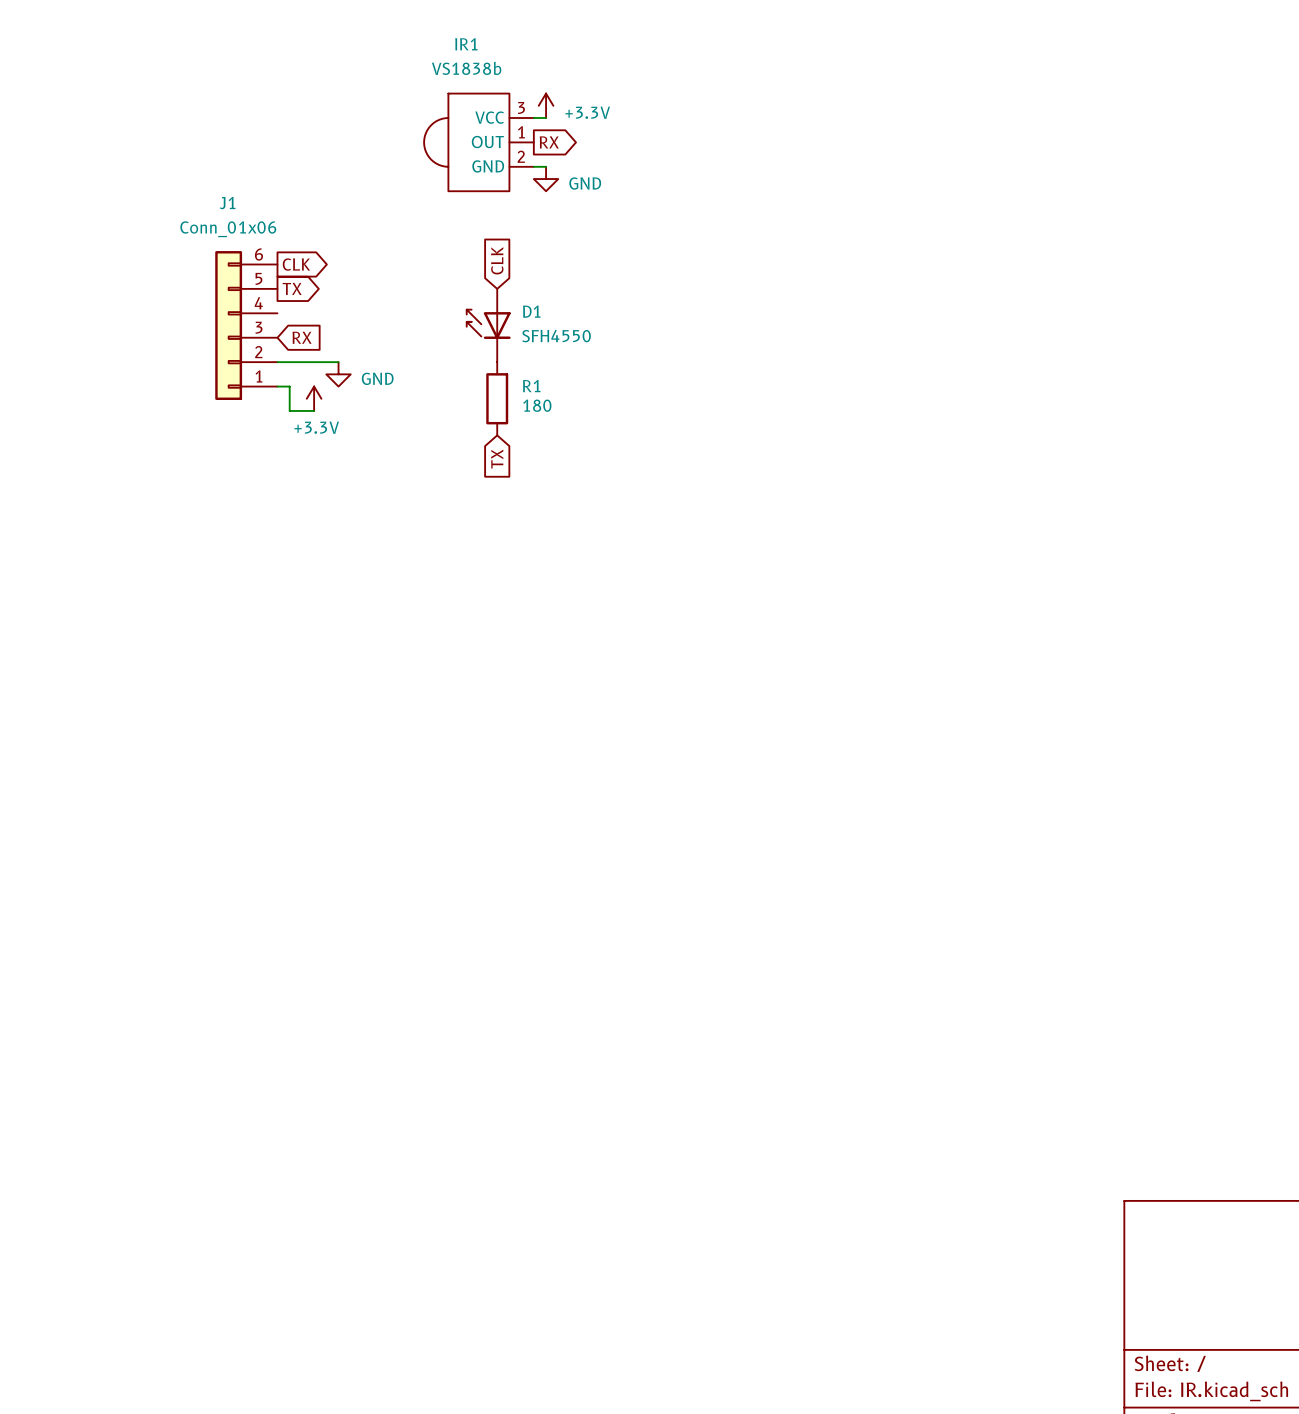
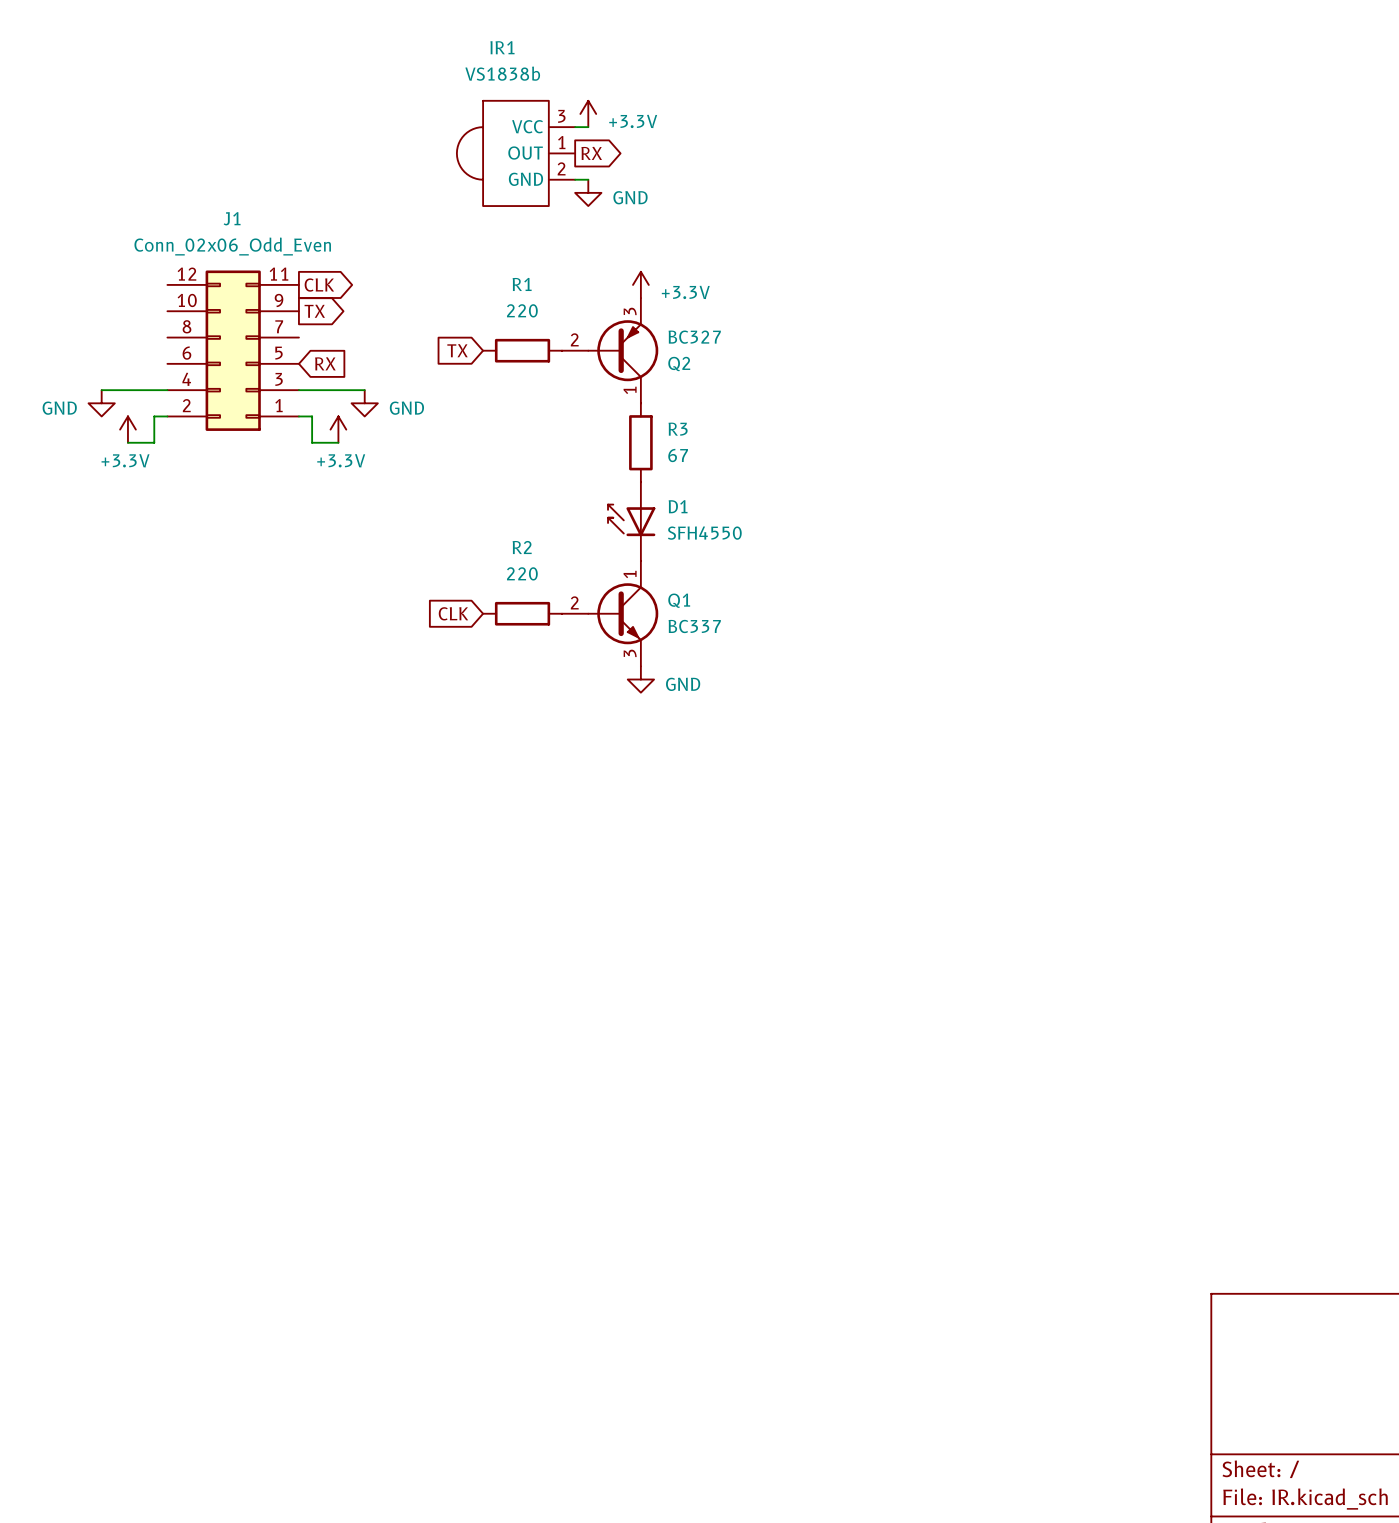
J1 value: Conn_01x06 (228, 229) -> Conn_02x06_Odd_Even (232, 246)
J1 symbol: [215, 251, 278, 400] -> [167, 270, 299, 431]
global label: CLK (497, 260) -> none
power symbol: none -> +3.3V (640, 284)
D1 position: (488, 325) -> (631, 521)
Q2: none -> BC327 (610, 350)
wire: none -> (101, 390) (167, 390)
power symbol: none -> GND (101, 403)
wire: none -> (167, 416) (154, 416) (154, 442) (127, 442)
R1 name position: R1 (531, 386) -> R1 (522, 284)
power symbol: none -> +3.3V (127, 429)
R1 rotation: 0° (497, 398) -> 90° clockwise (522, 350)
R1 position: (497, 398) -> (522, 350)
R1 value: 180 (537, 405) -> 220 (522, 310)
R3: none -> 67 (640, 442)
global label rotation: 0° (497, 459) -> 90° clockwise (457, 350)
global label position: TX (497, 459) -> TX (457, 350)
global label: none -> CLK (453, 613)
R2: none -> 220 (522, 613)
Q1: none -> BC337 (610, 613)
power symbol: none -> GND (640, 679)

